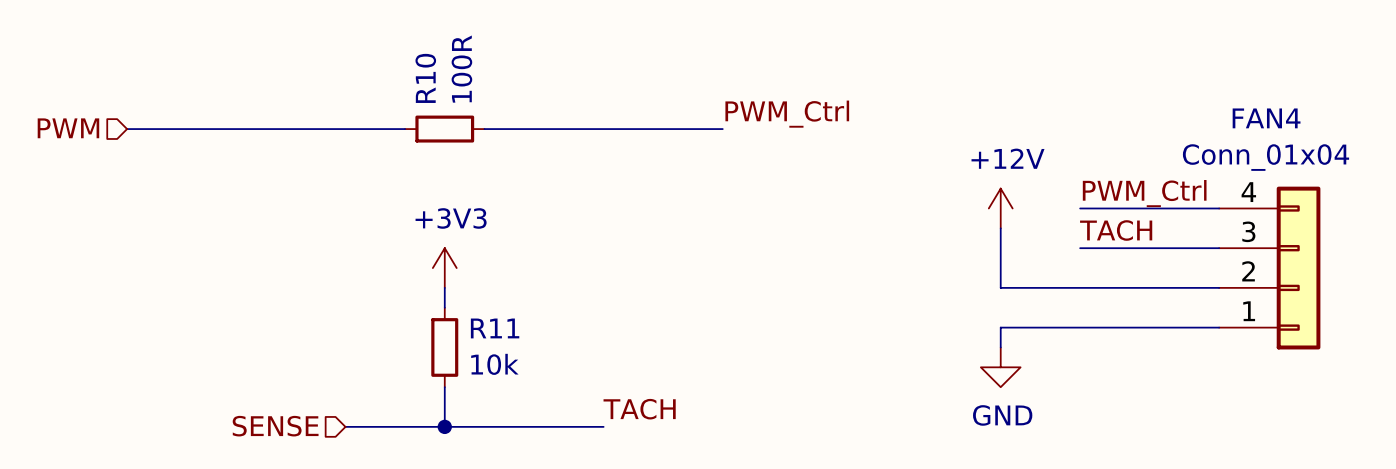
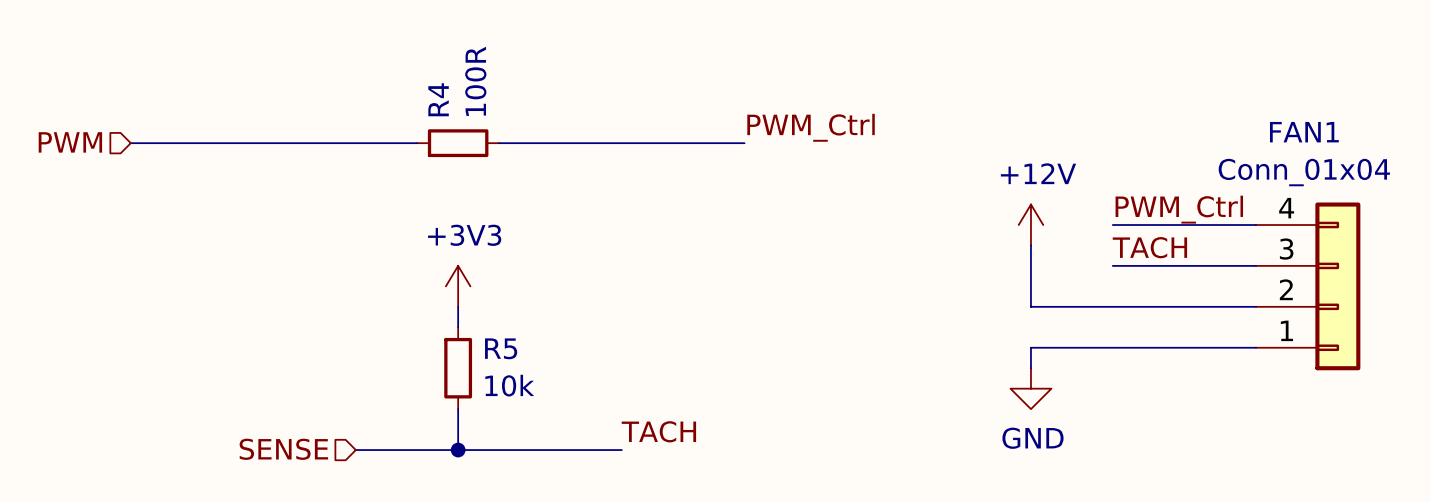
R10 name: R10 (425, 78) -> R4 (438, 99)
FAN4 name: FAN4 (1266, 118) -> FAN1 (1304, 132)
R11 name: R11 (495, 328) -> R5 (501, 348)

